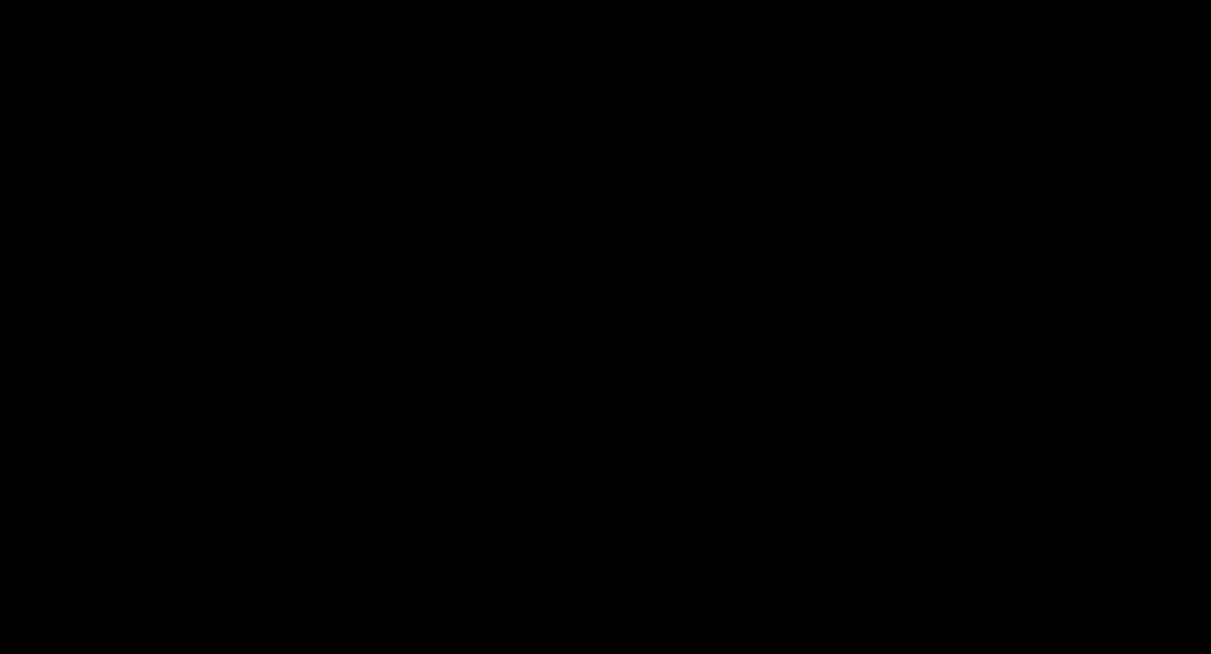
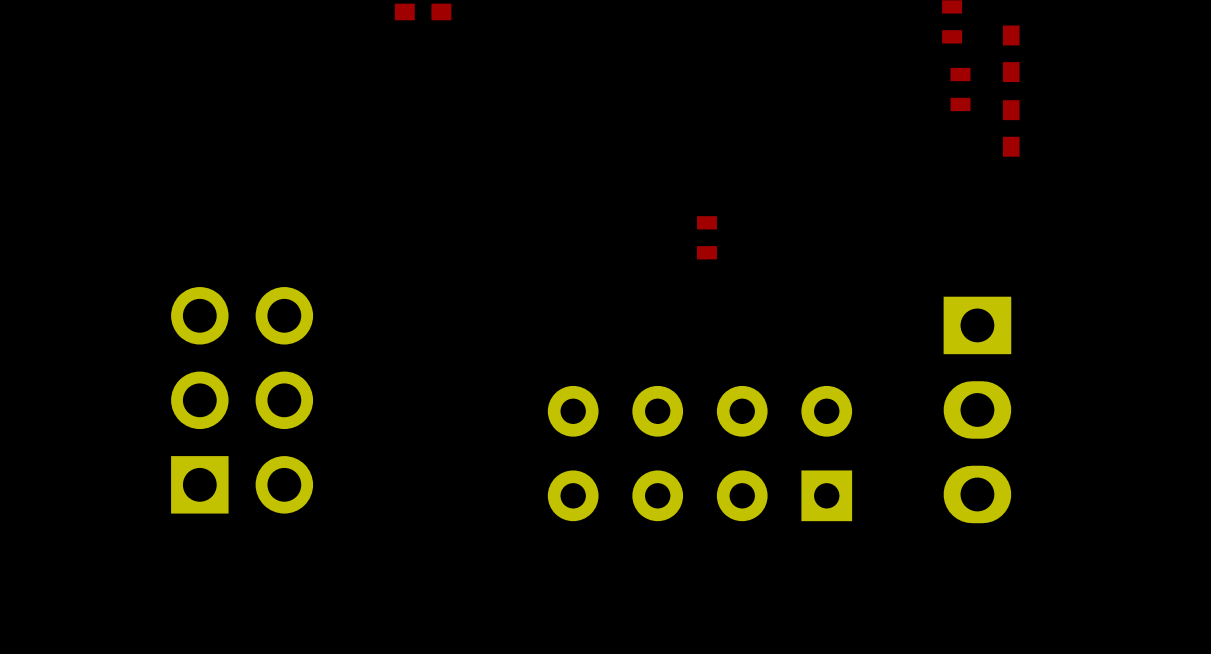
part: none -> (423, 11)
part: none -> (952, 21)
part: none -> (1011, 53)
part: none -> (960, 89)
part: none -> (1011, 128)
part: none -> (706, 237)
part: none -> (242, 400)
part: none -> (977, 409)
part: none -> (699, 453)

